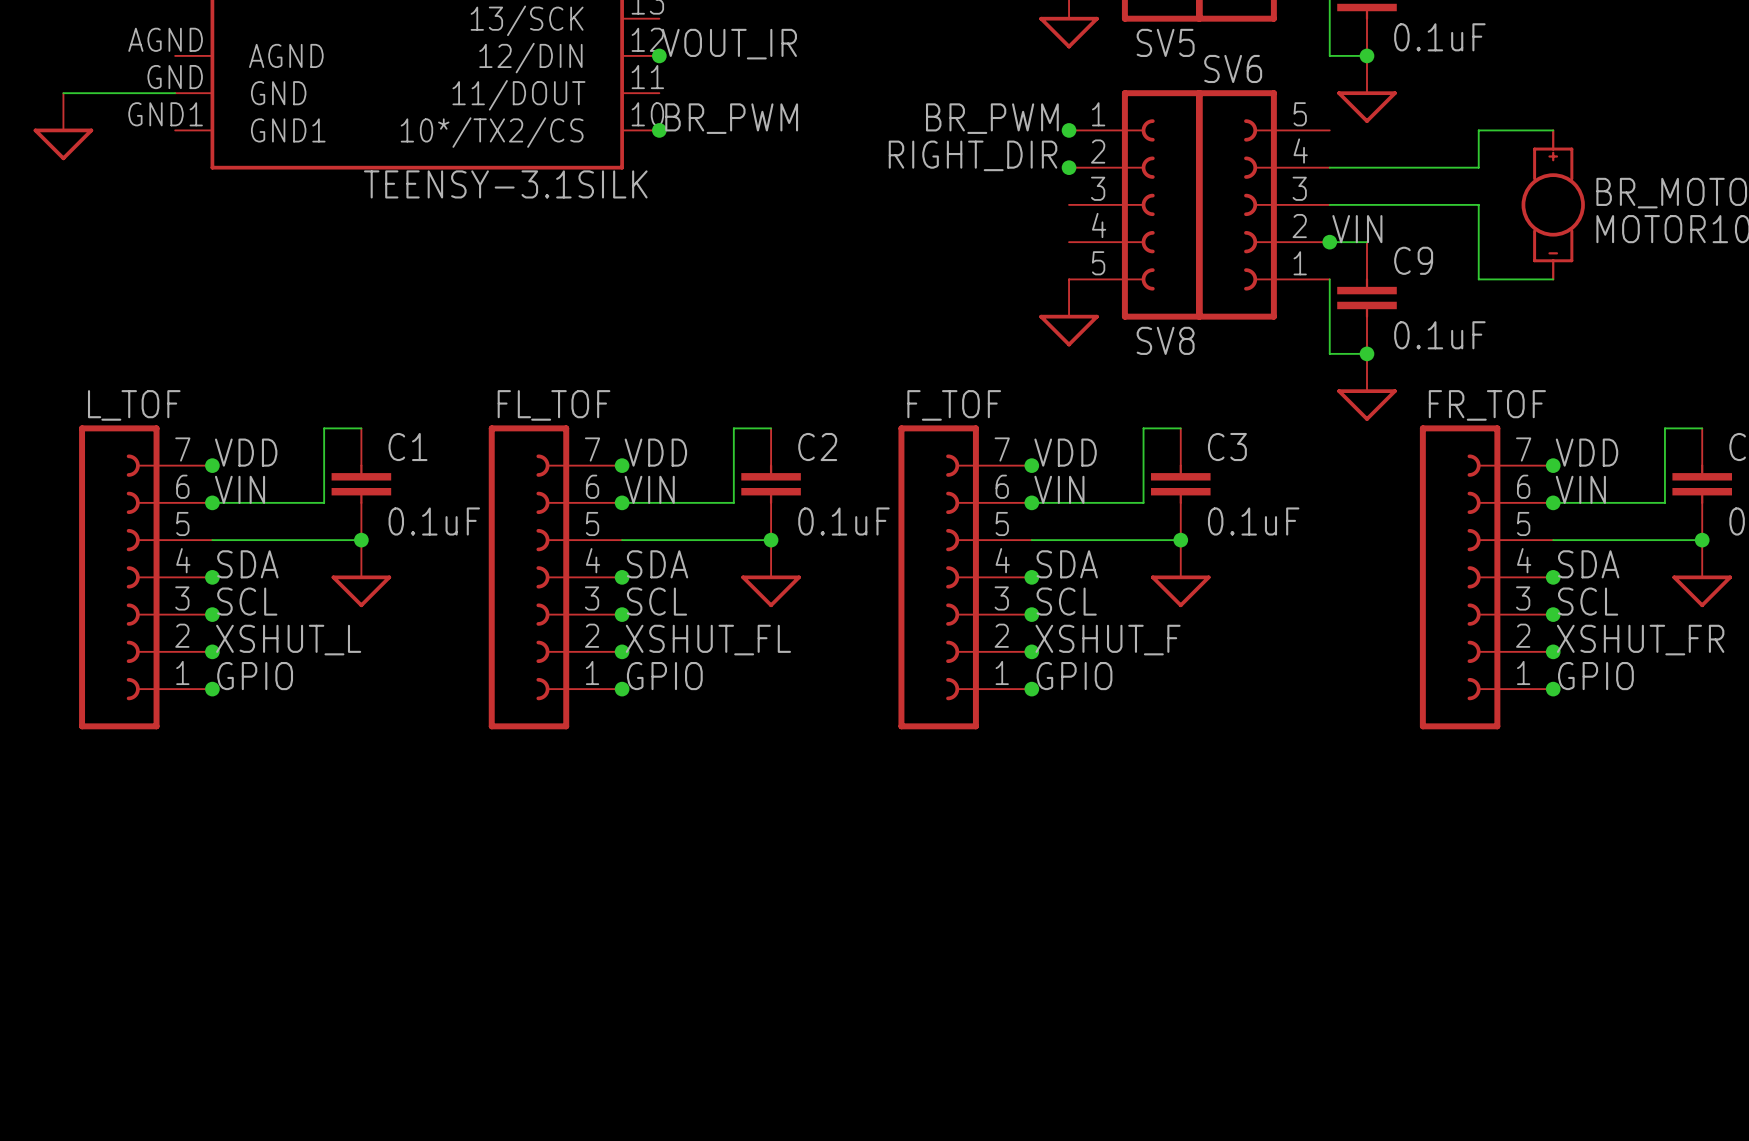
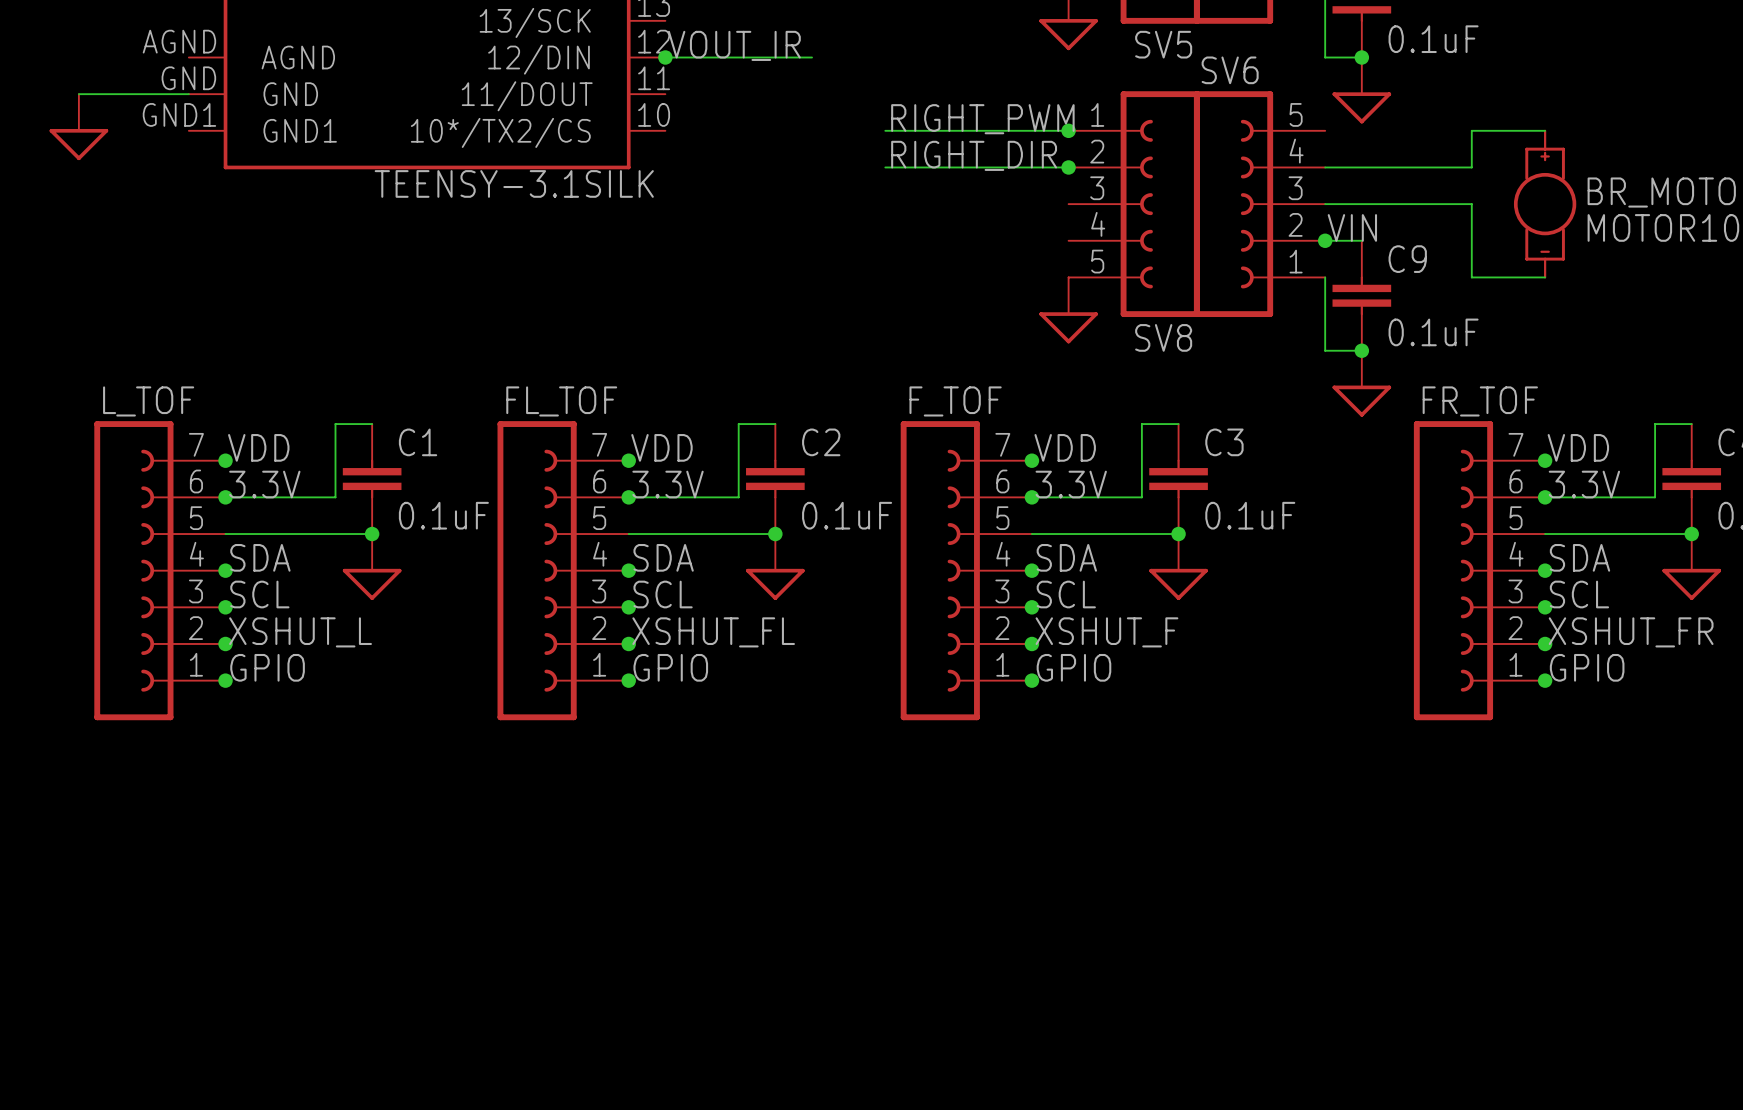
wire: none -> (665, 57) (812, 57)
label: BR_PWM (731, 118) -> none
label: BR_PWM (992, 118) -> RIGHT_PWM (982, 119)
junction: (659, 130) -> none
wire: none -> (885, 130) (1068, 130)
wire: none -> (885, 167) (1068, 167)
label: VIN (240, 489) -> 3.3V (264, 484)
label: VIN (649, 489) -> 3.3V (668, 484)
label: VIN (1059, 489) -> 3.3V (1071, 484)
label: VIN (1580, 489) -> 3.3V (1584, 484)

